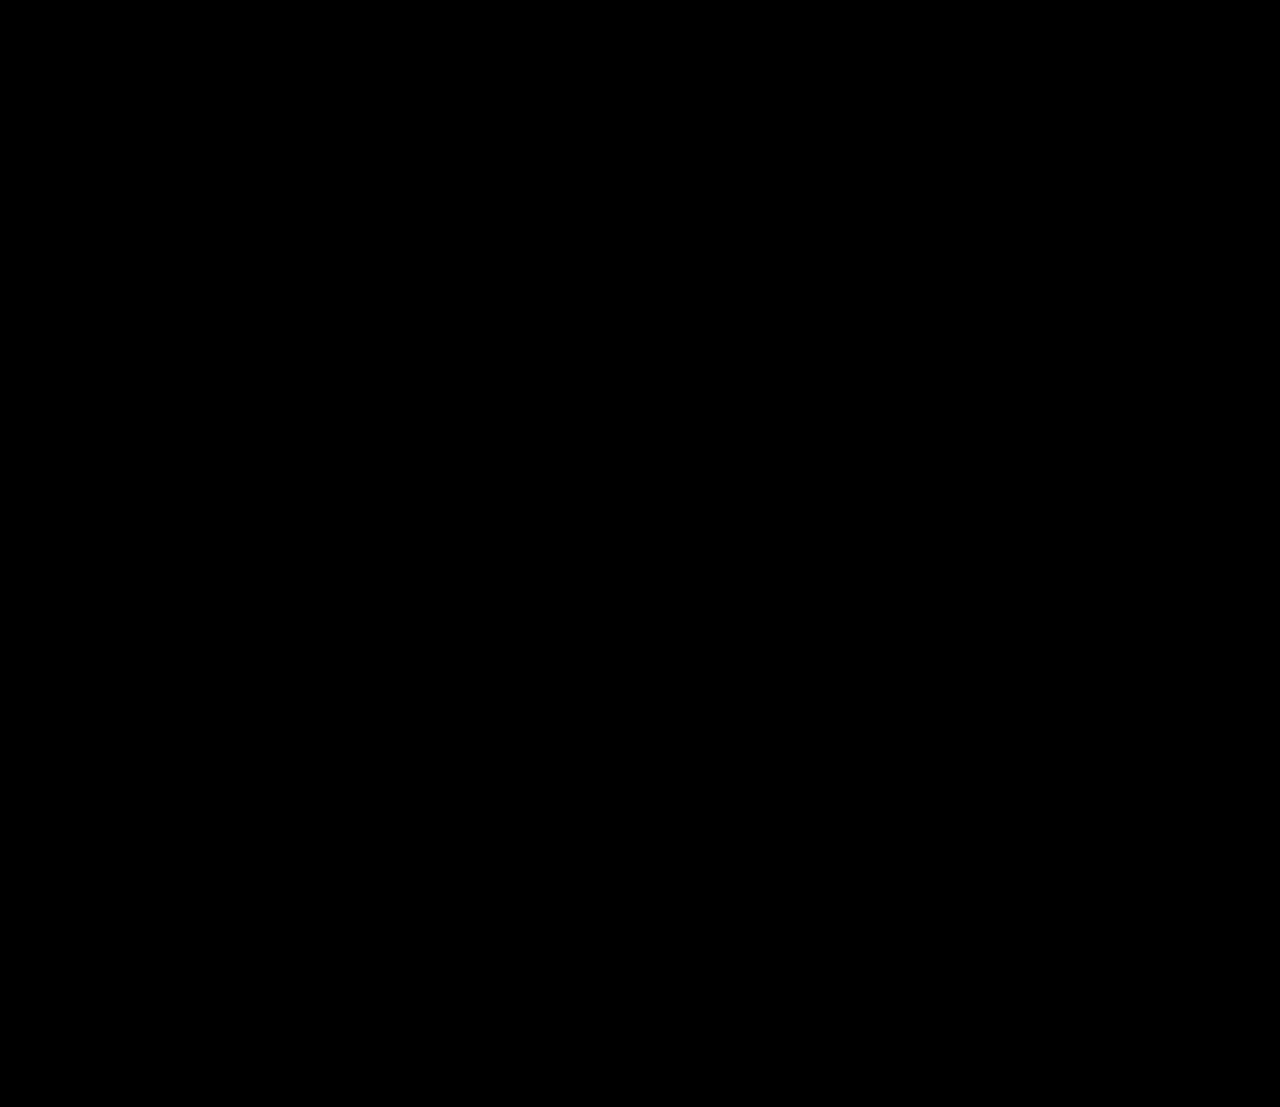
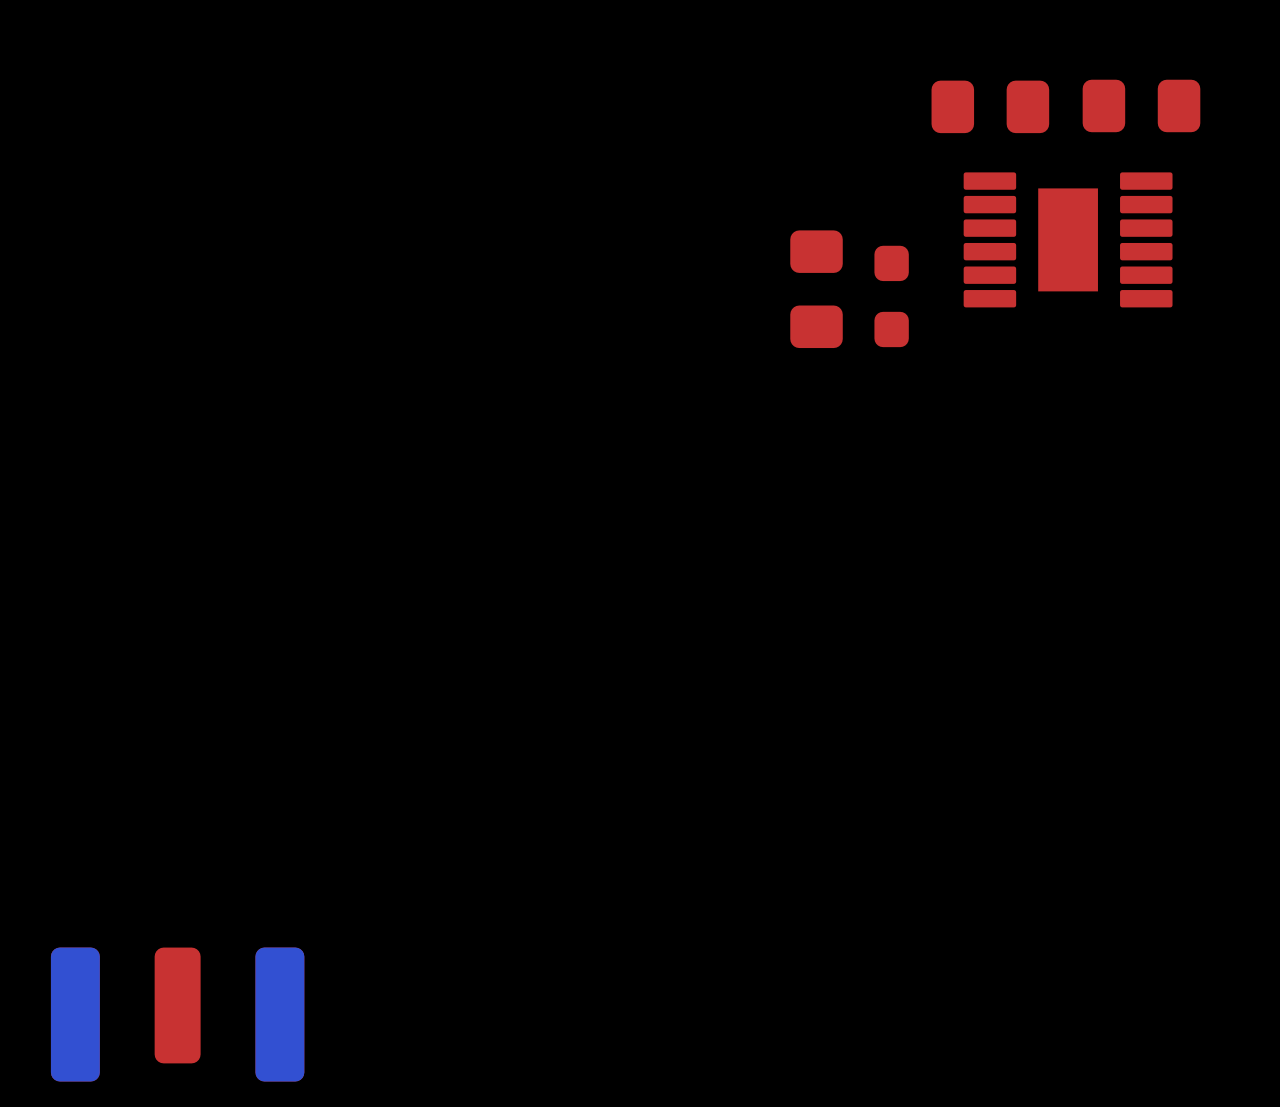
part: none -> (1141, 105)
part: none -> (990, 106)
part: none -> (1068, 239)
part: none -> (816, 289)
part: none -> (891, 296)
part: none -> (177, 1014)

